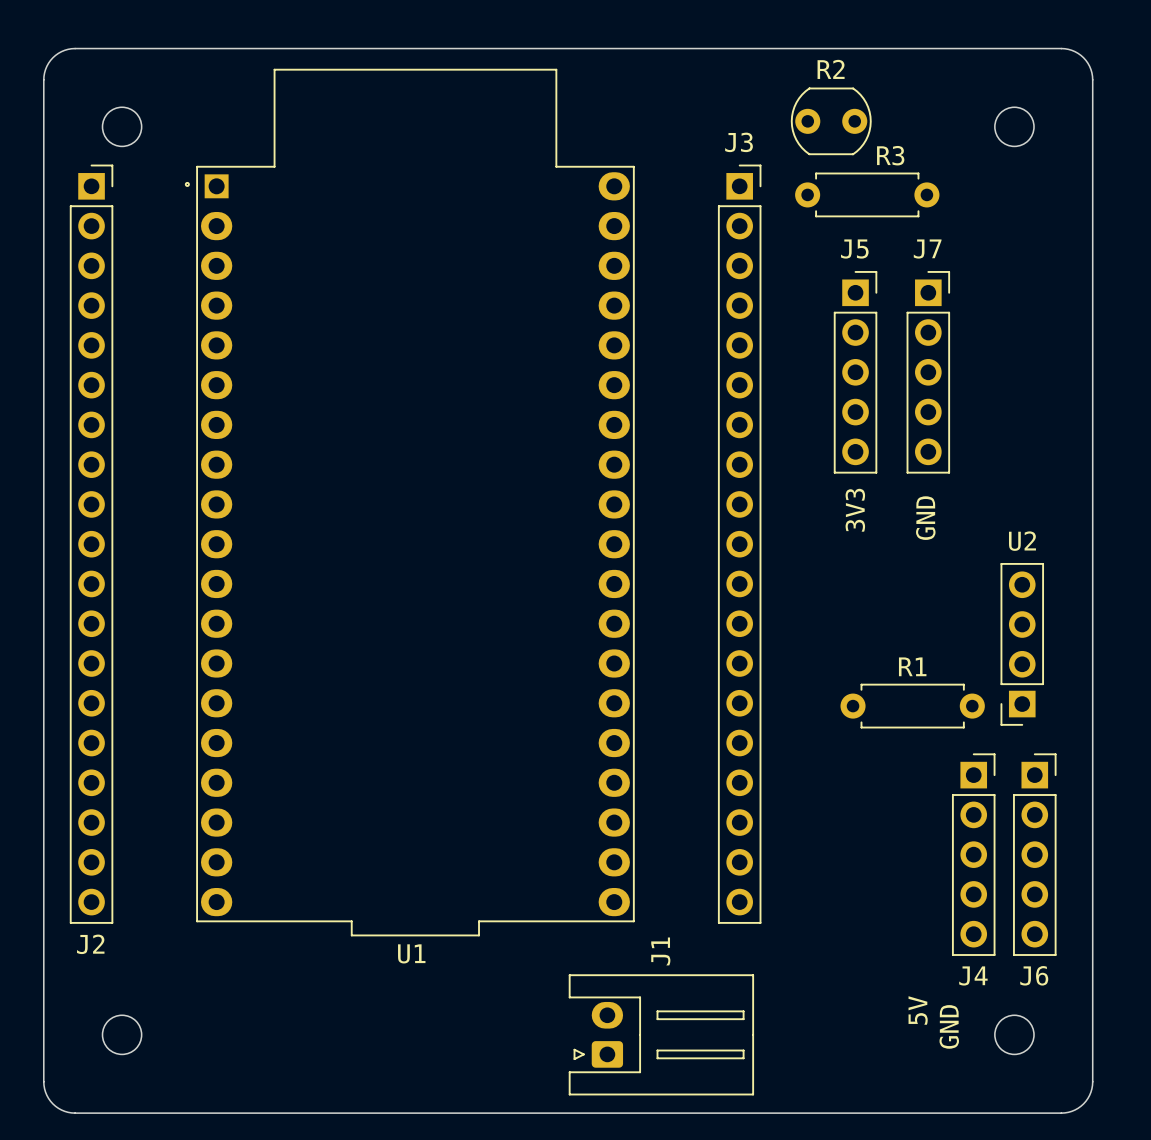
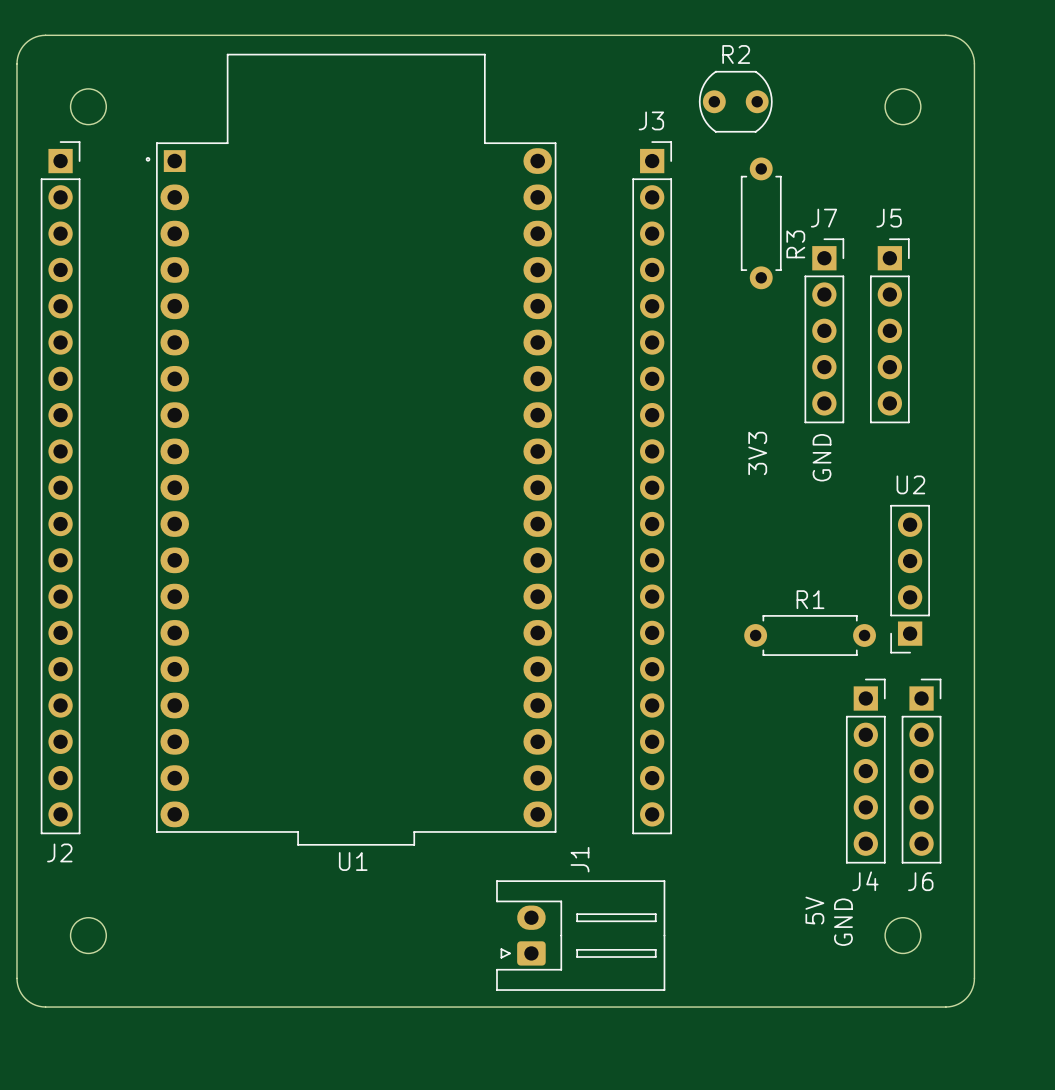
R3 rotation: 0° (867, 194) -> 90° clockwise (761, 223)
J5 position: (855, 372) -> (889, 330)

